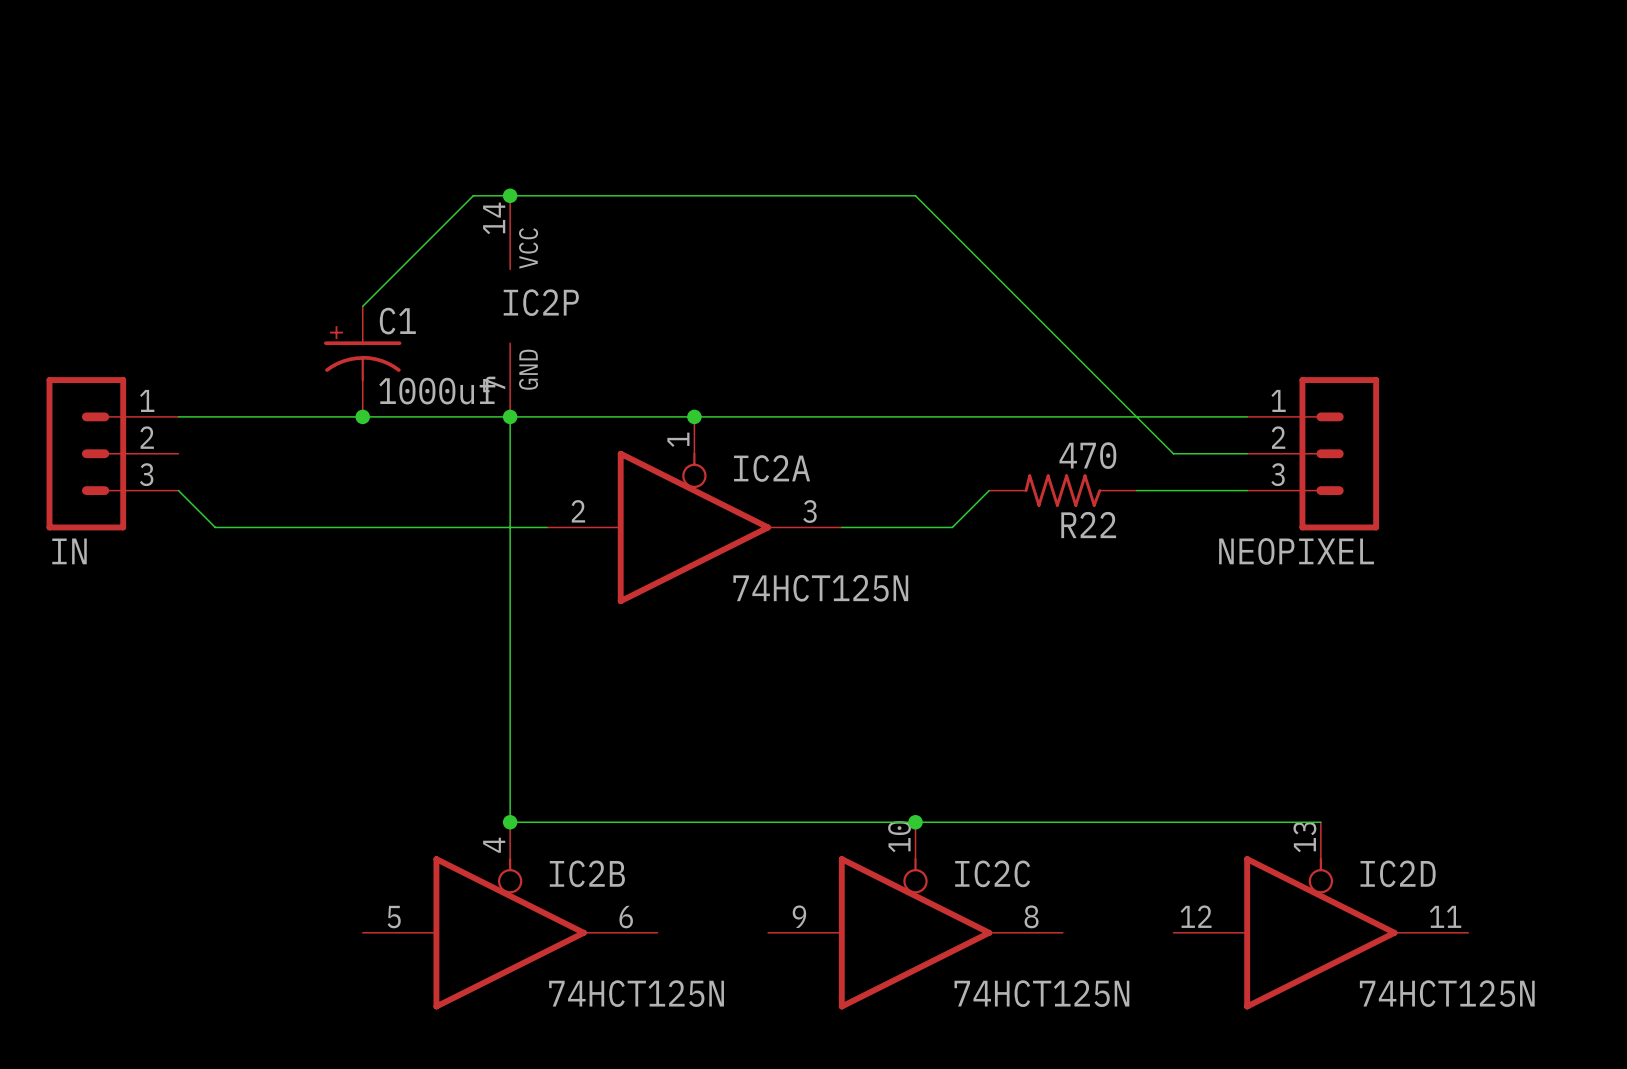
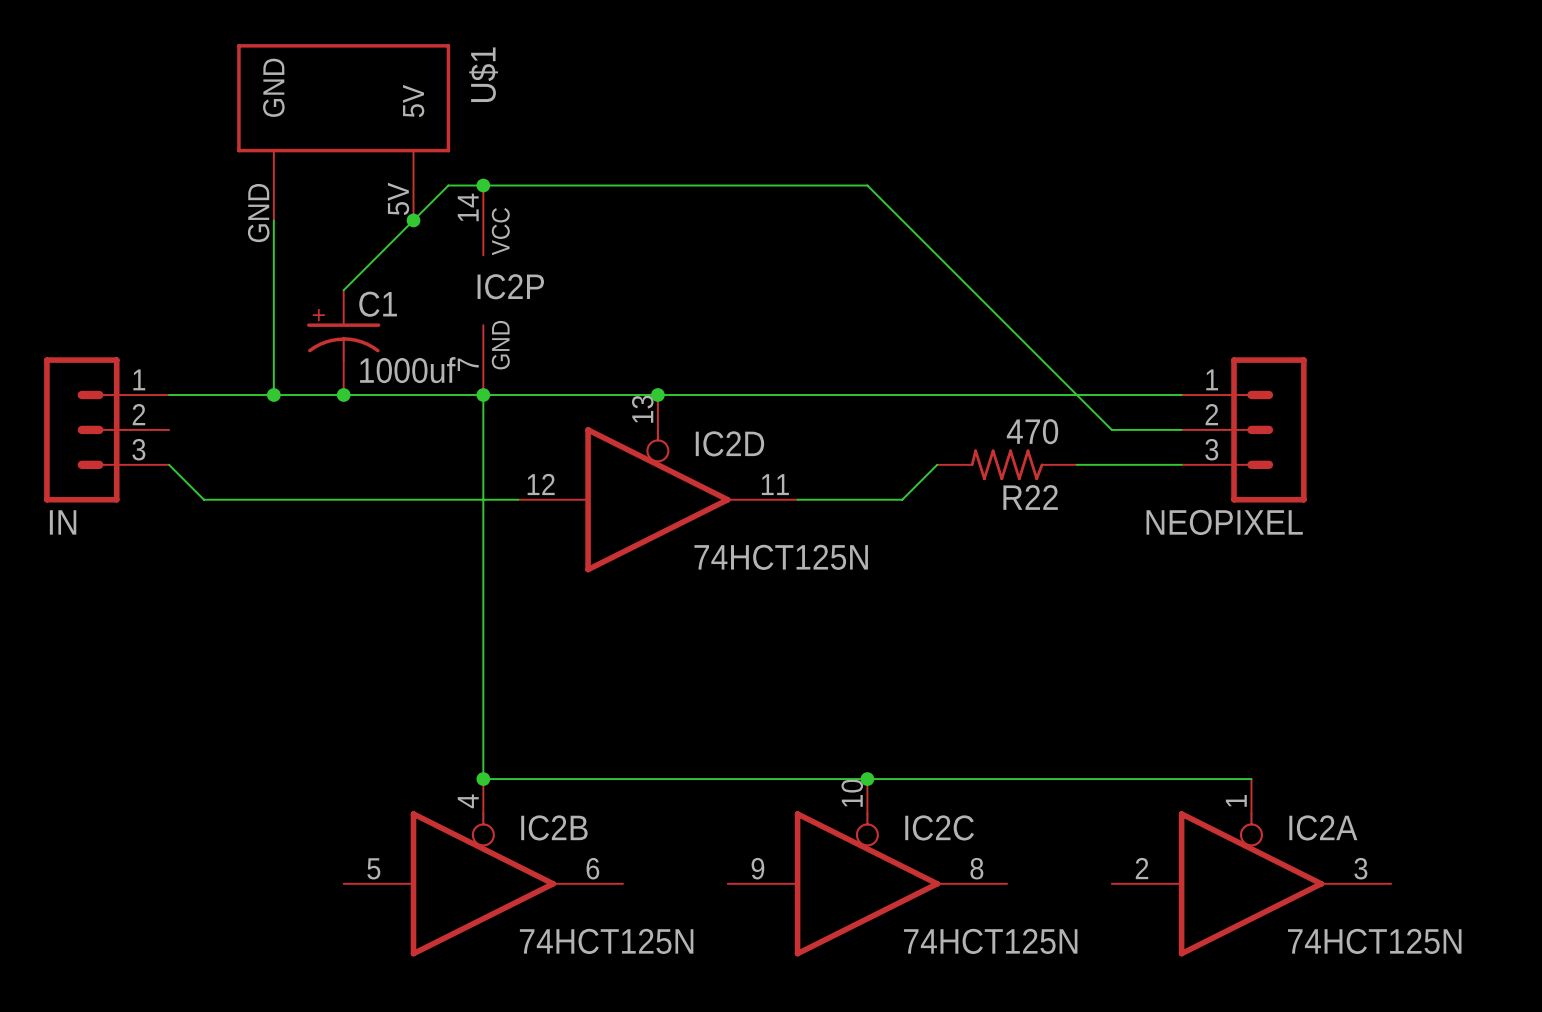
U$1: none -> (343, 132)
wire: none -> (273, 220) (273, 395)
junction: none -> (413, 220)
junction: none -> (273, 395)
IC2A position: (694, 510) -> (1251, 867)
IC2D position: (1320, 915) -> (657, 483)

